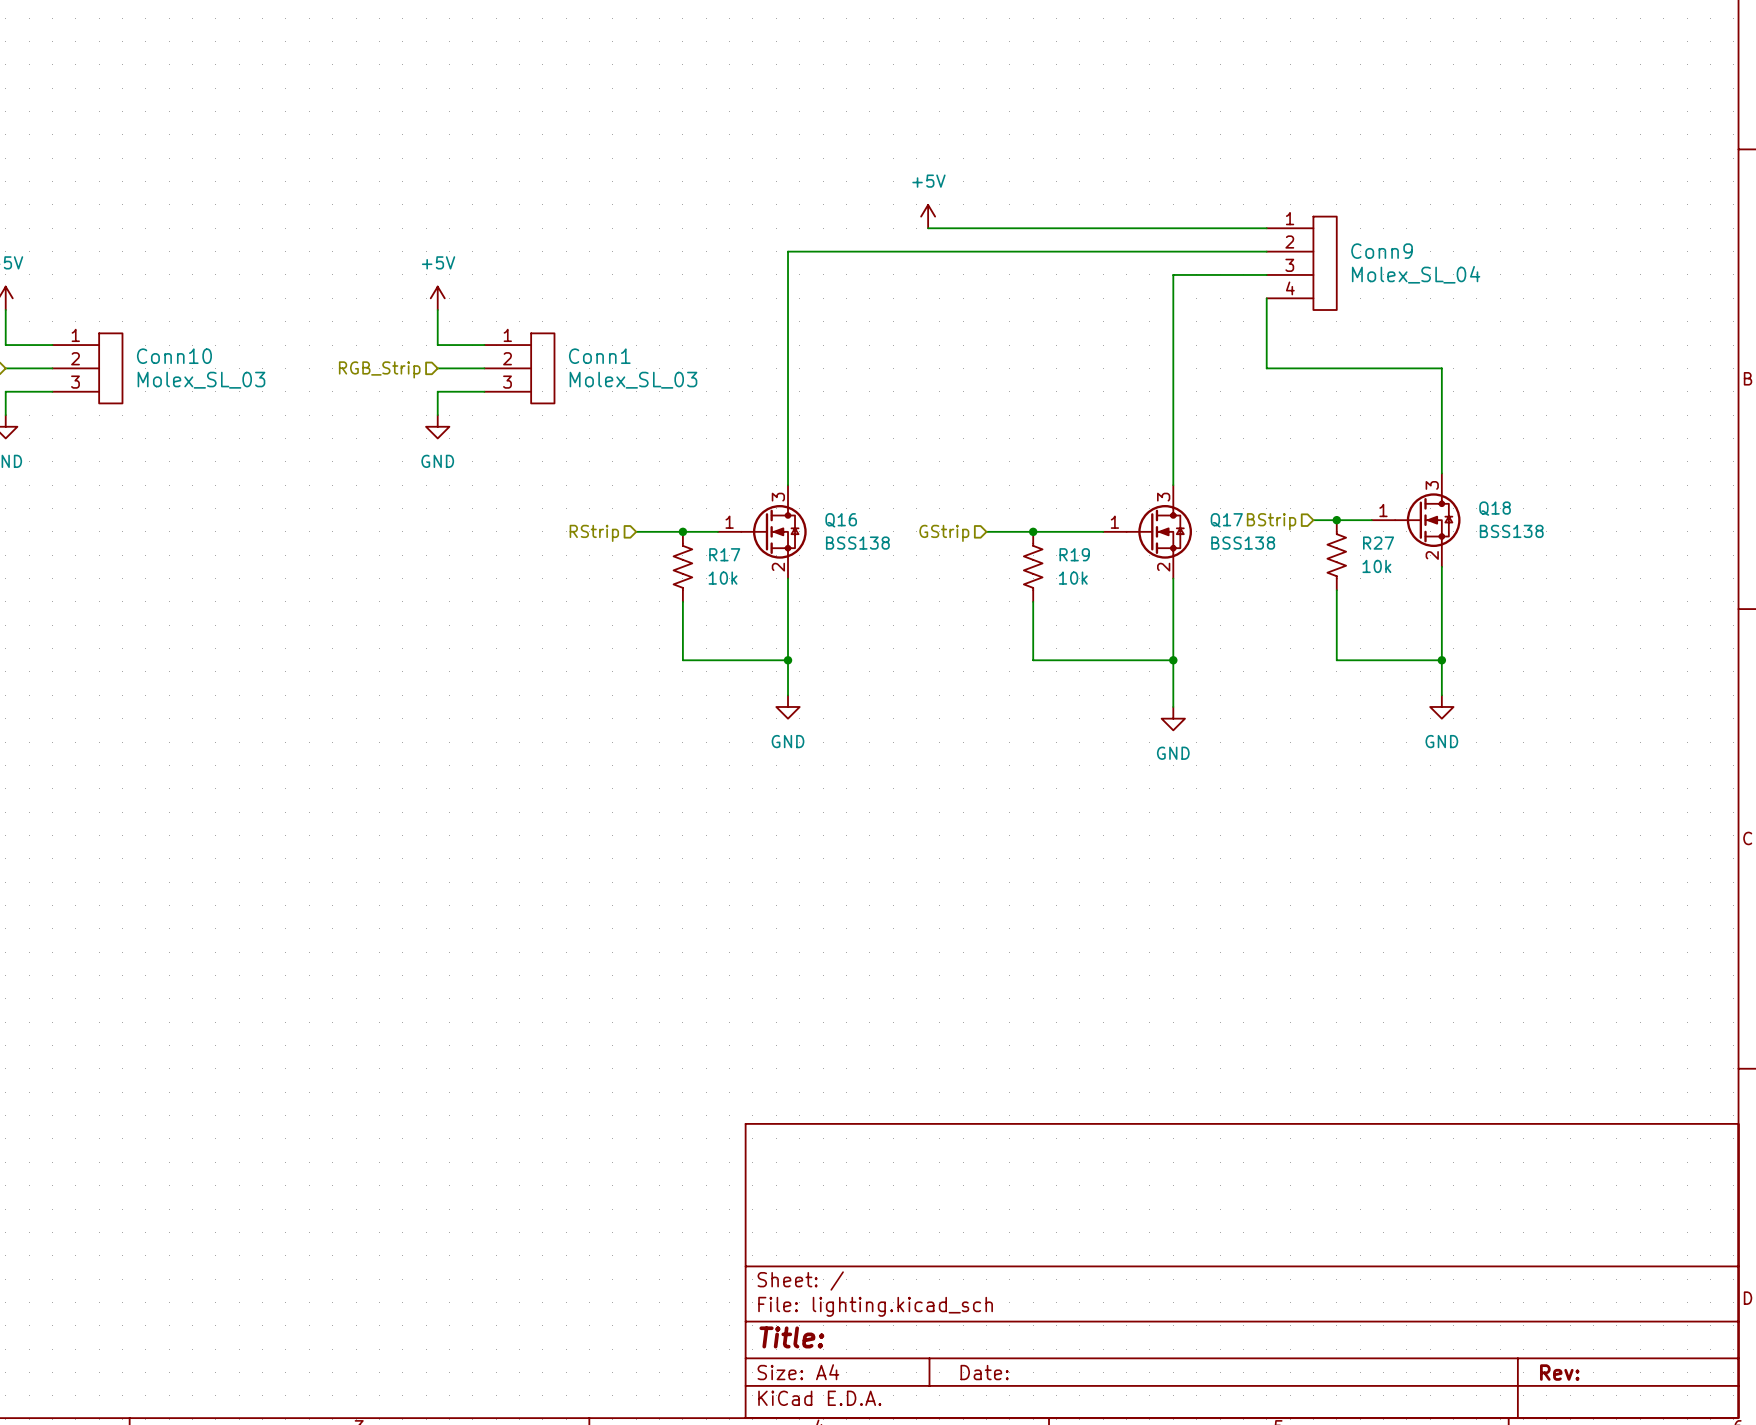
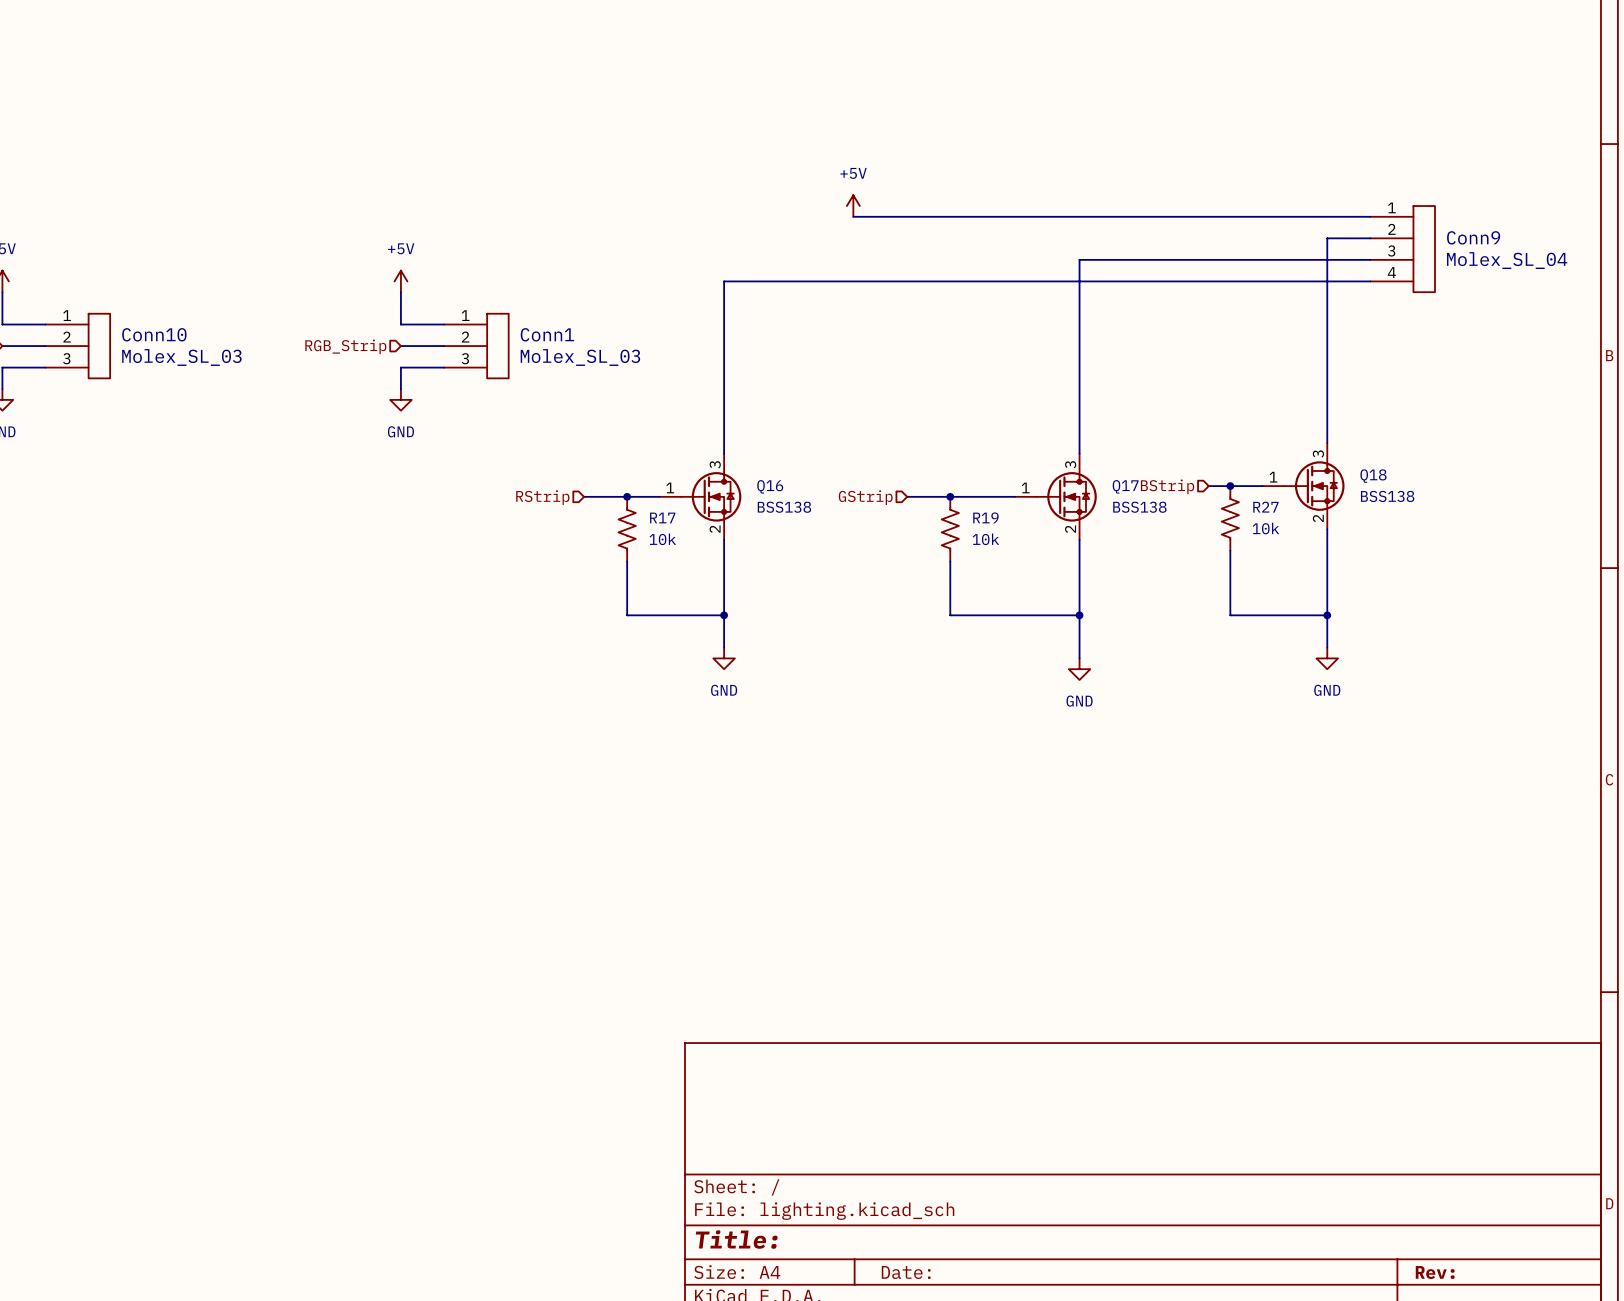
wire: none -> (1165, 216) (1370, 216)
wire: (1266, 251) (788, 251) (788, 298) -> (1370, 281) (724, 281)
Conn9 position: (1301, 263) -> (1402, 249)
wire: none -> (1165, 259) (1370, 259)
wire: (1266, 298) (1266, 368) (1441, 368) -> (1370, 238) (1327, 238) (1327, 346)

